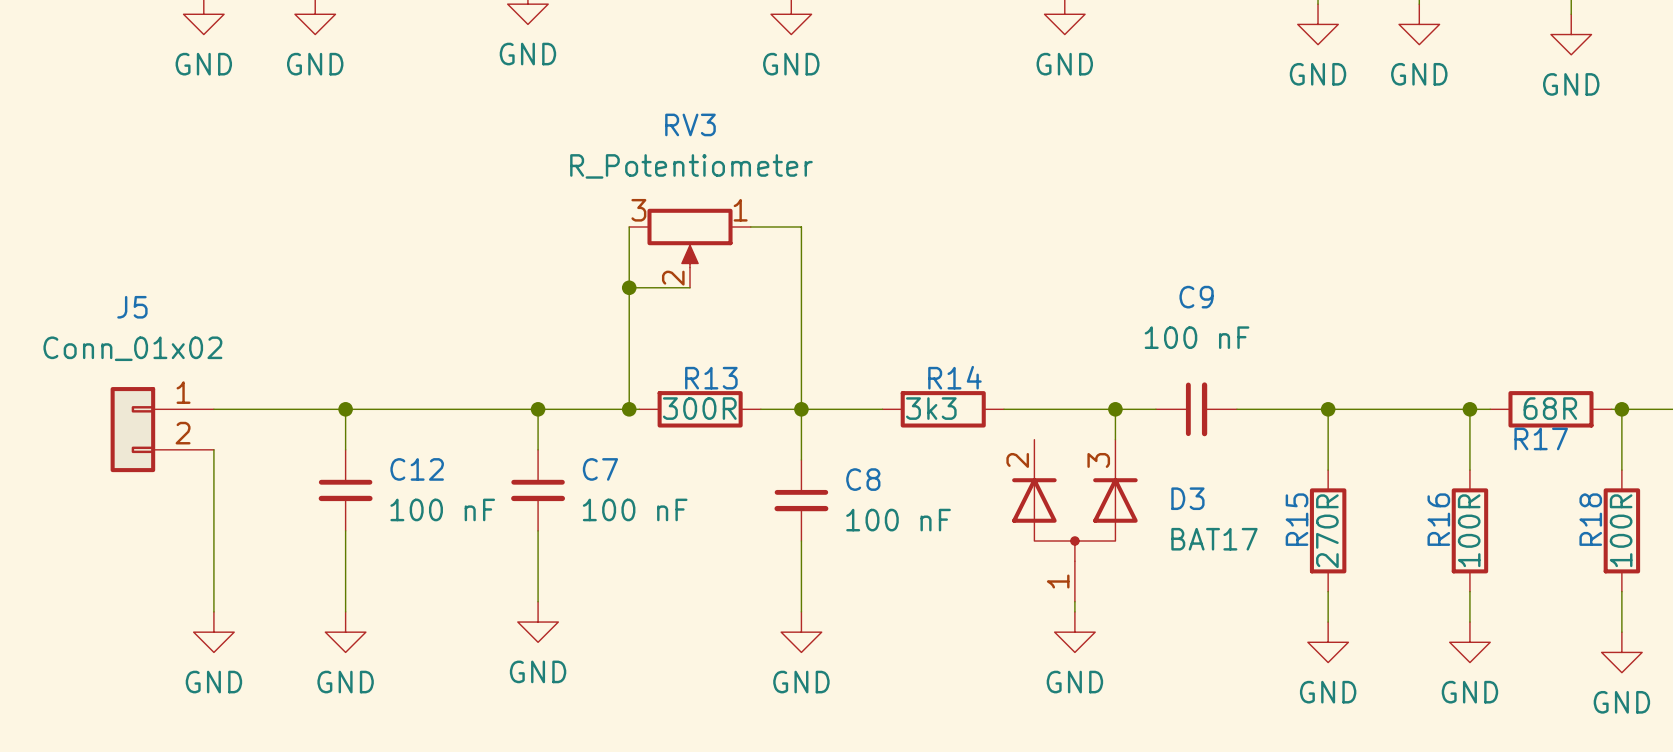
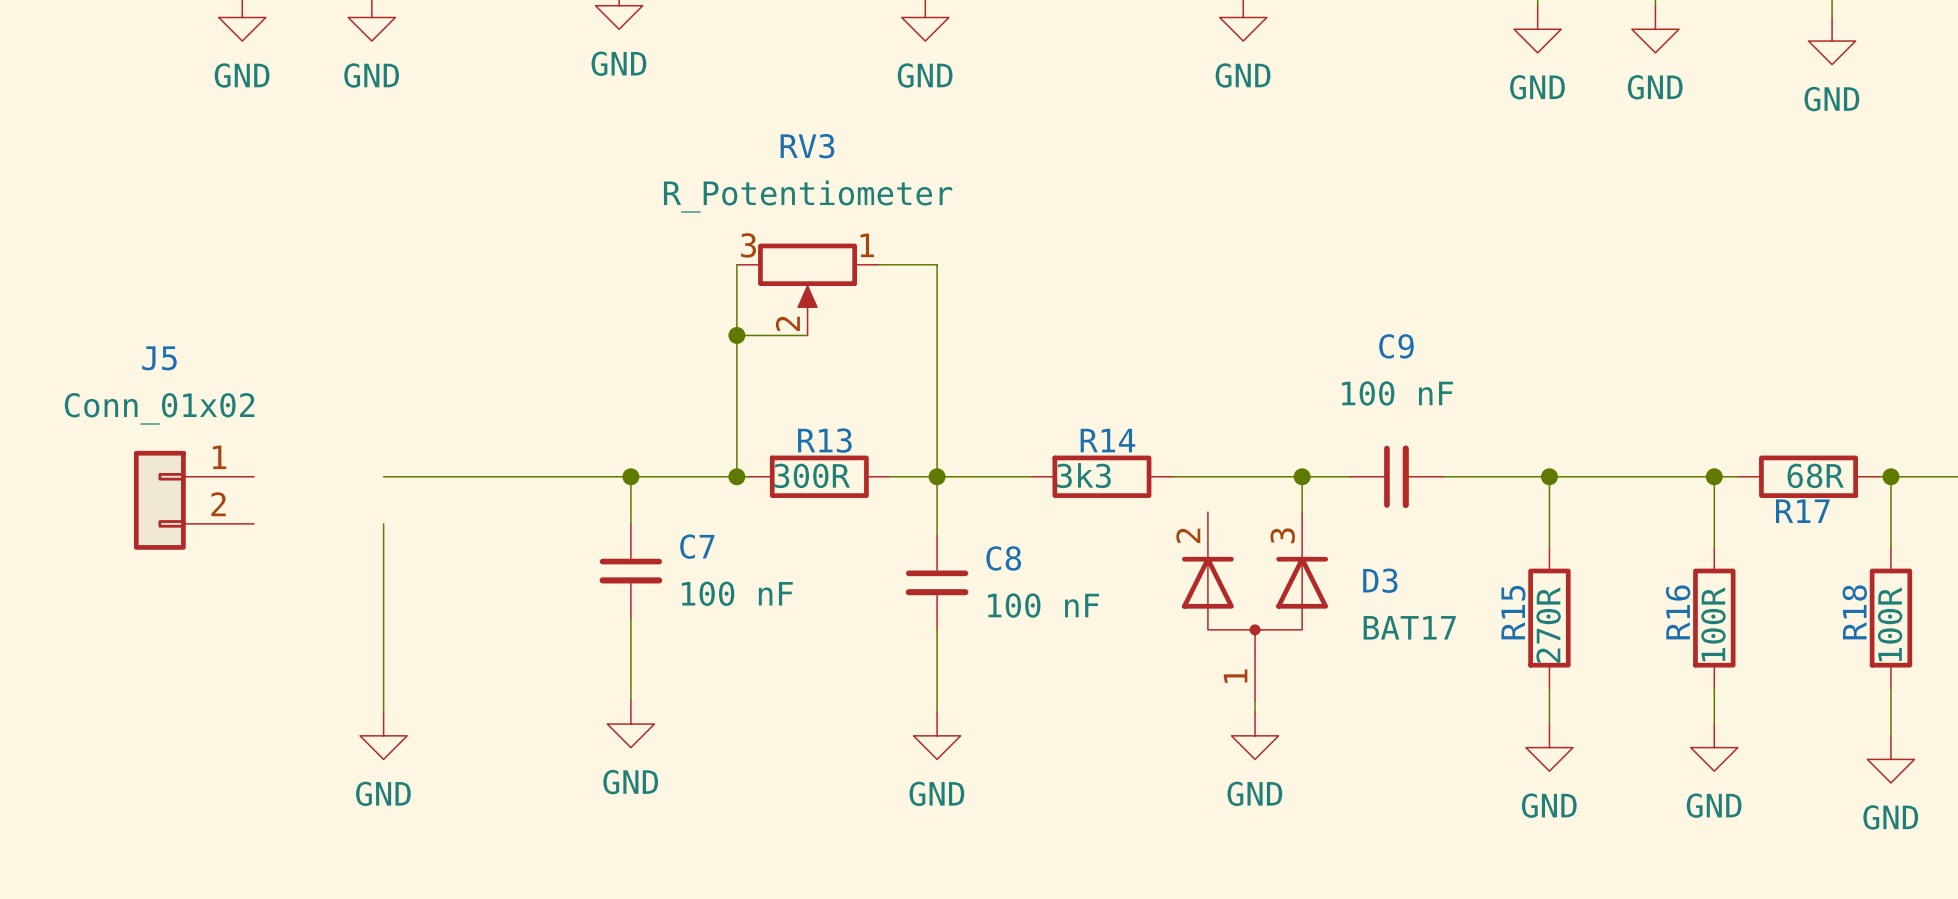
wire: (213, 409) (325, 409) -> none
wire: (345, 409) (345, 449) -> none
junction: (345, 409) -> none
wire: (213, 449) (213, 611) -> (383, 523) (383, 712)
C12: 100 nF (345, 490) -> none
wire: (345, 530) (345, 611) -> none
power symbol: GND (213, 632) -> none
power symbol position: GND (345, 632) -> GND (383, 735)

